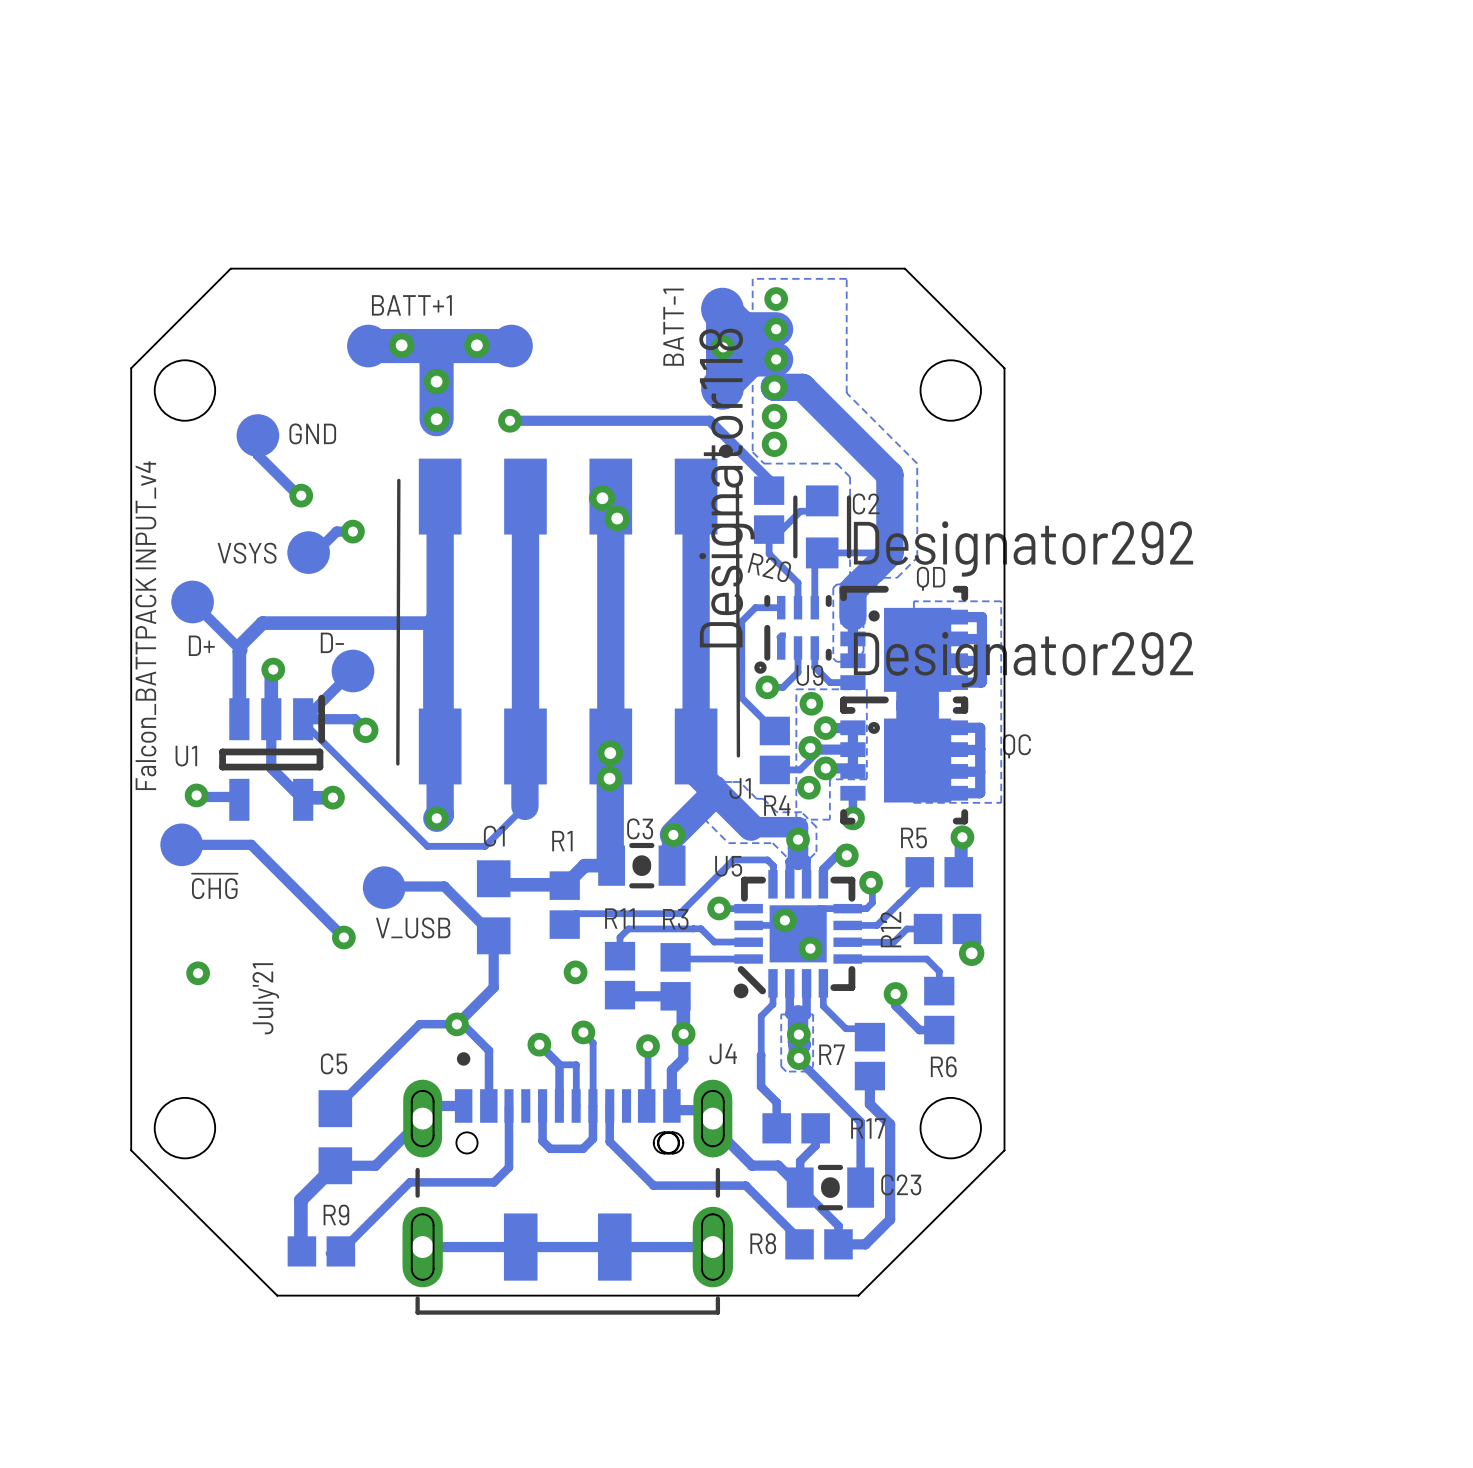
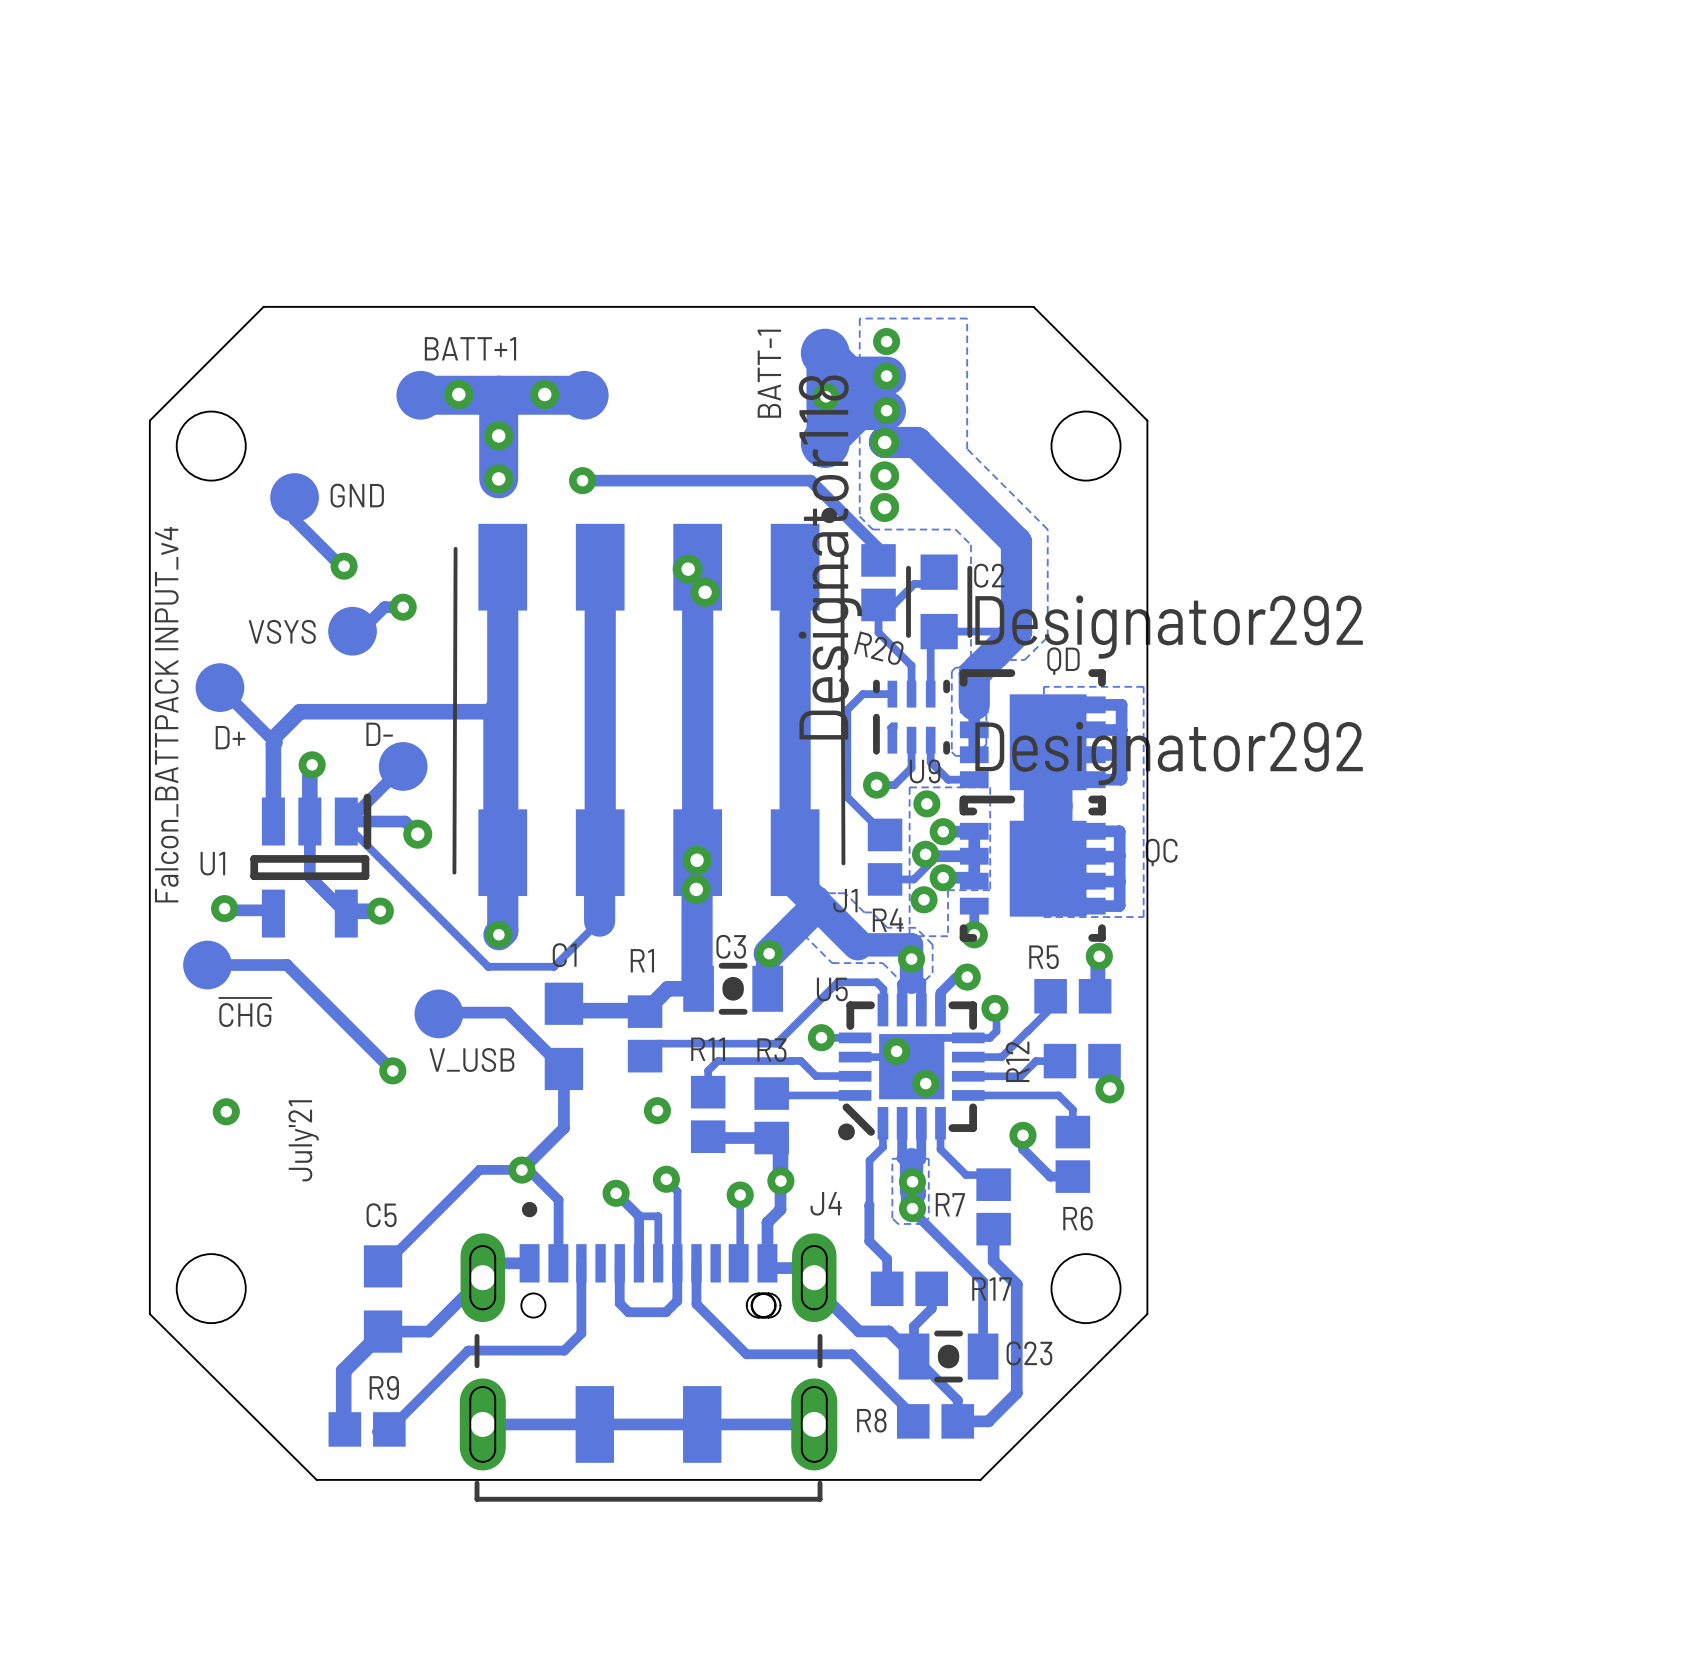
drawing: [868, 610, 880, 622] -> none
drawing: [754, 661, 767, 674] -> none
drawing: [868, 721, 880, 734] -> none

